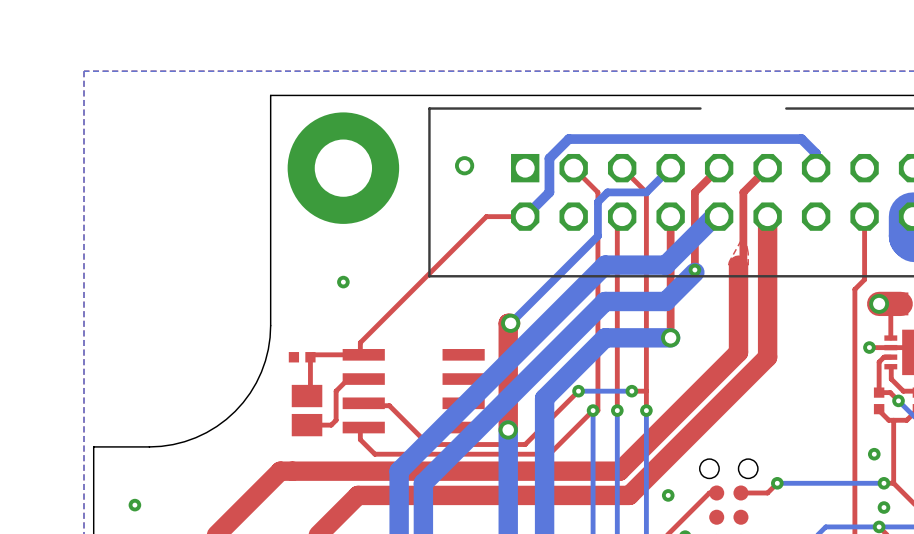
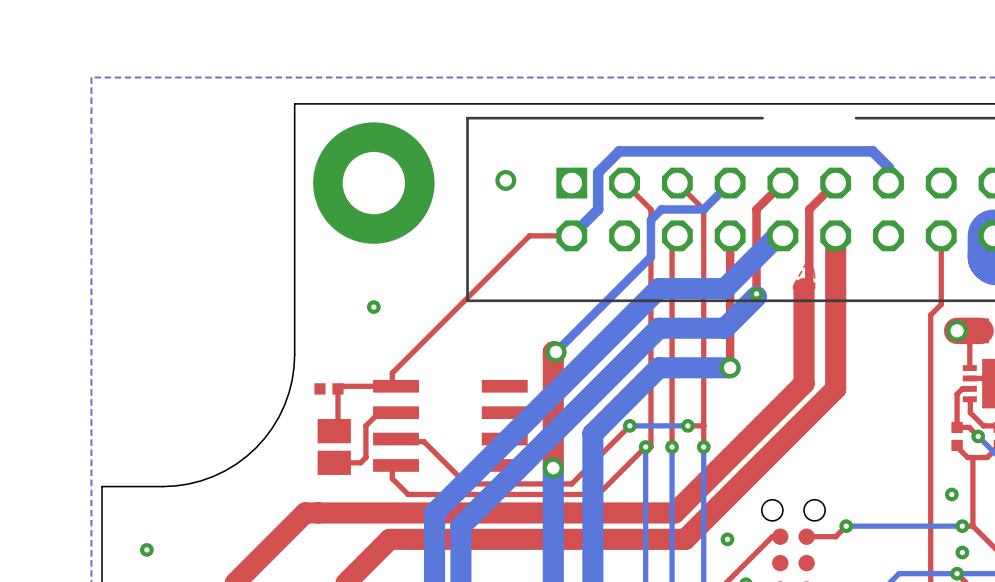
via: (869, 347) -> none
top track: (890, 347) (869, 347) -> none

